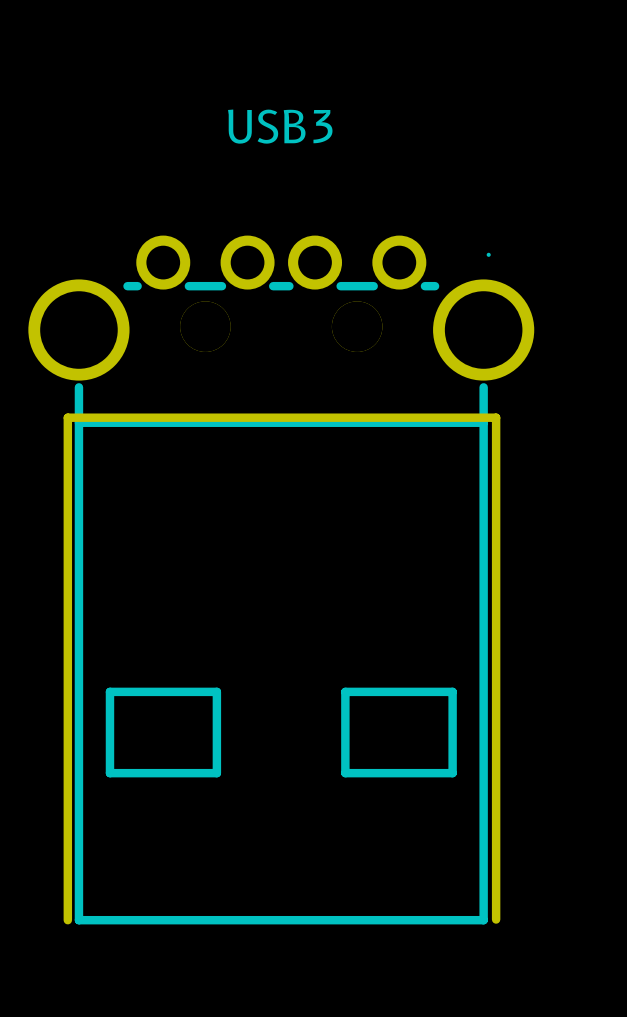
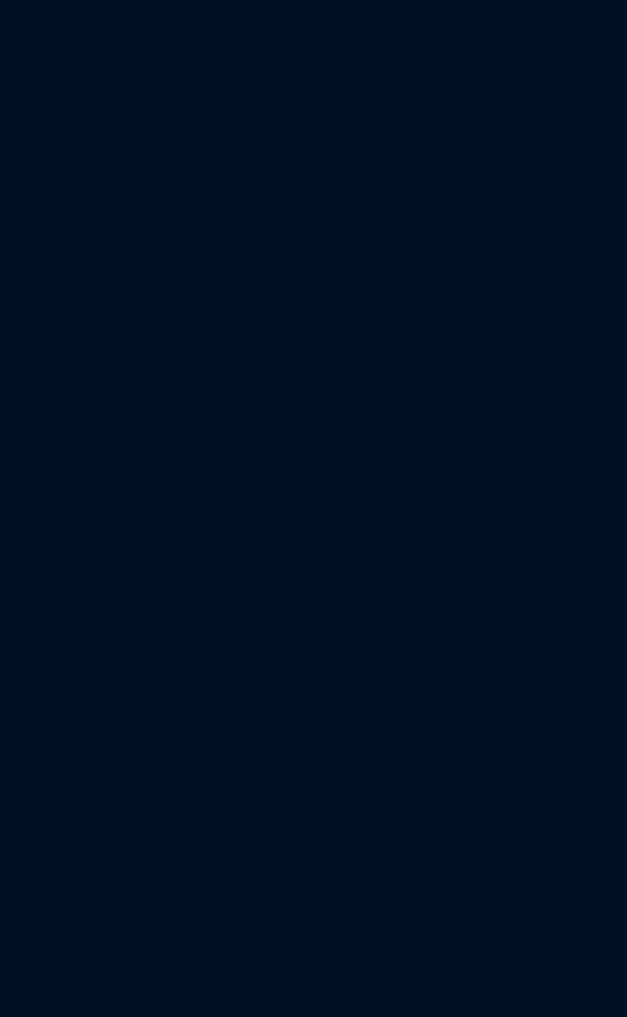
USB3: (281, 579) -> none

